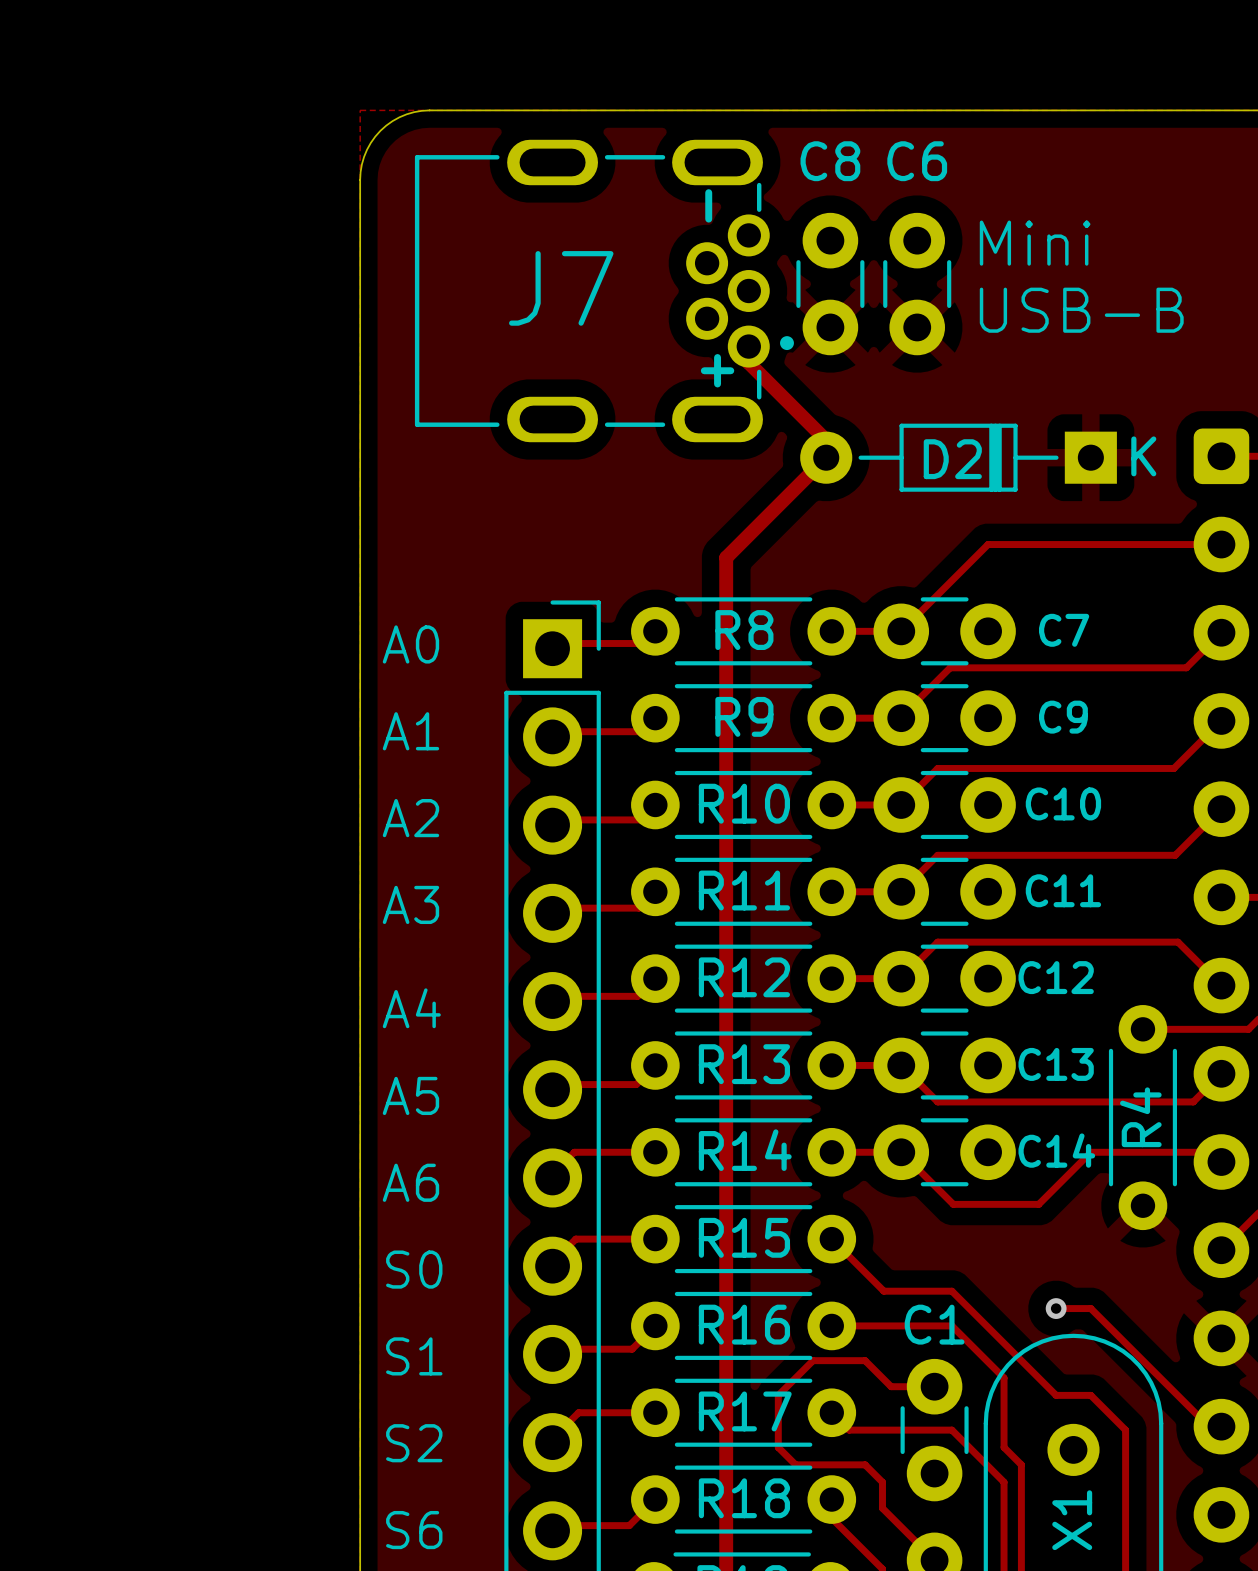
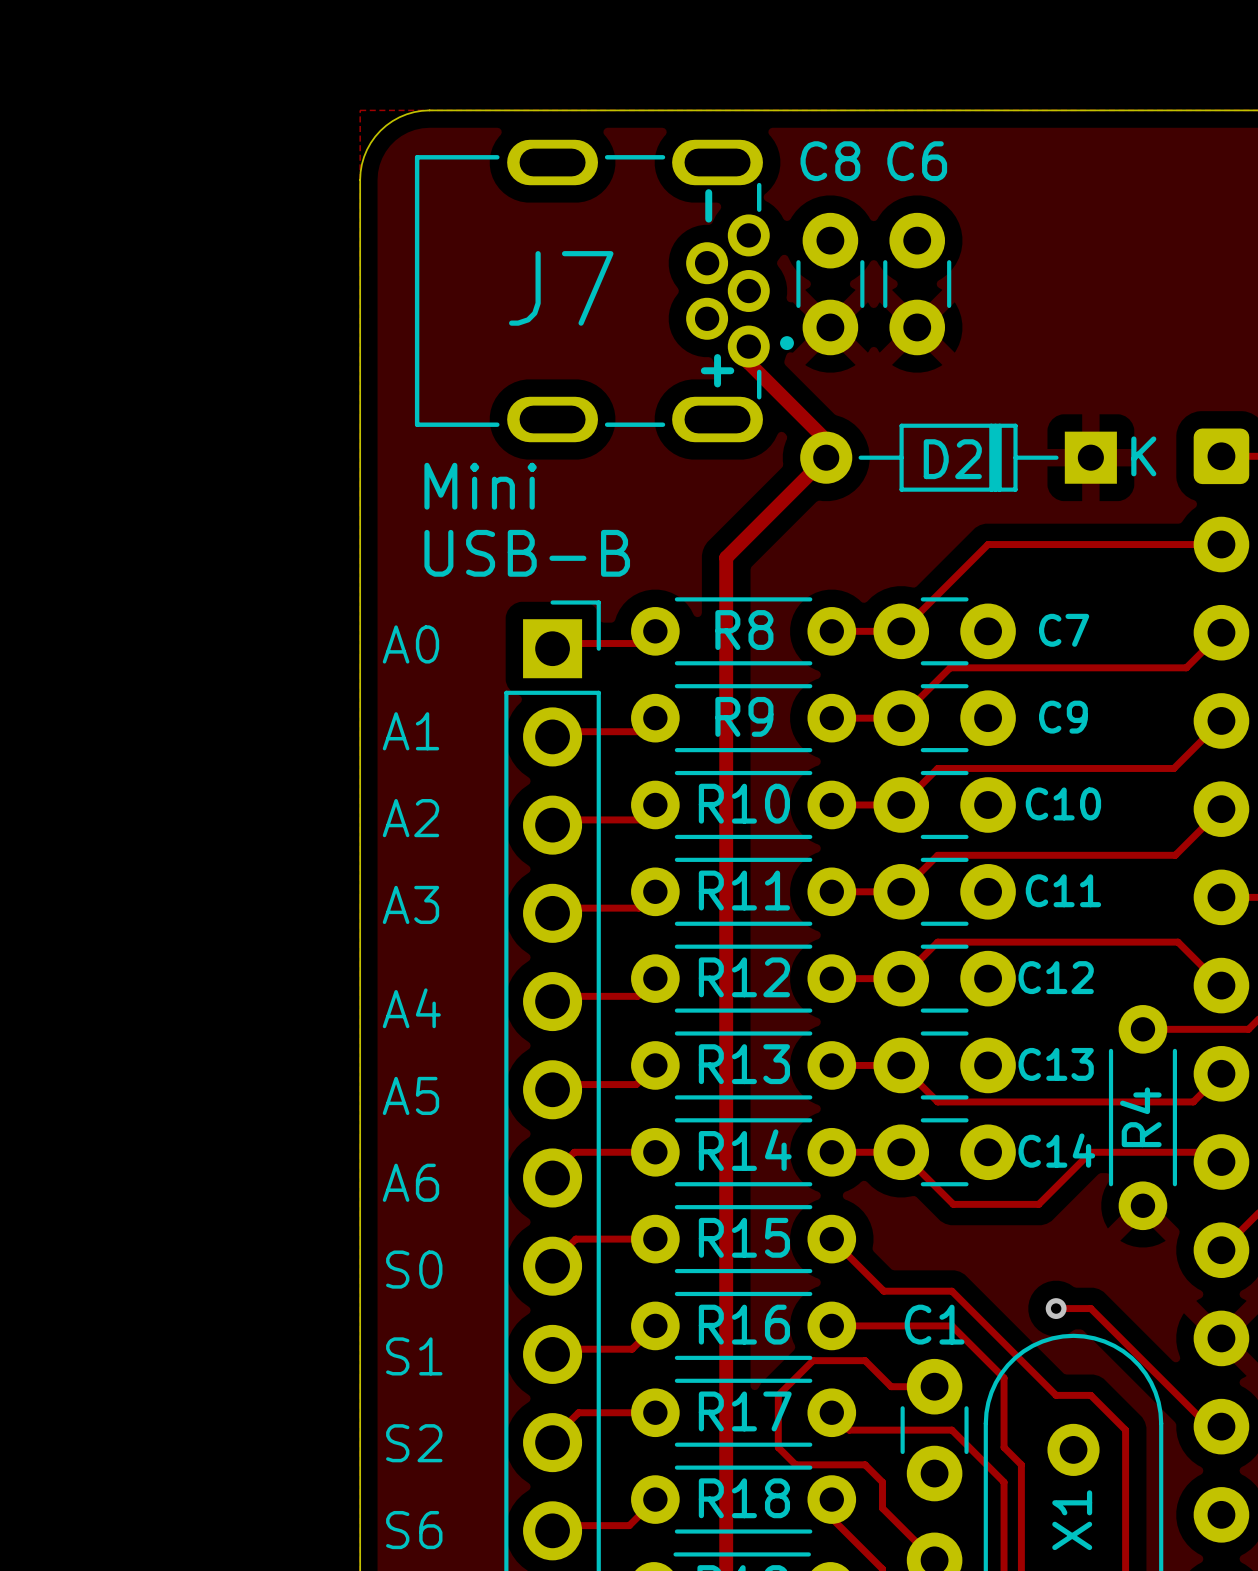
text position: Mini (1035, 243) -> Mini (480, 486)
text position: USB-B (1081, 310) -> USB-B (527, 553)

